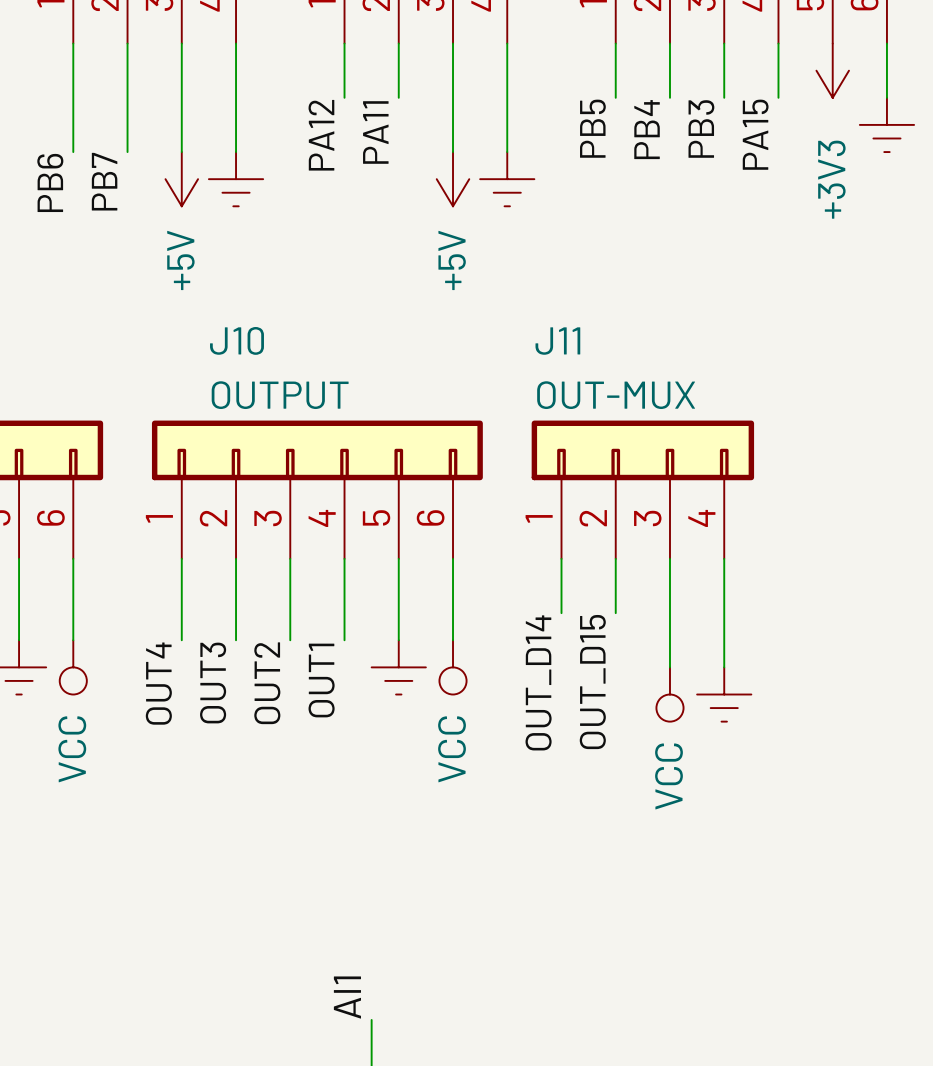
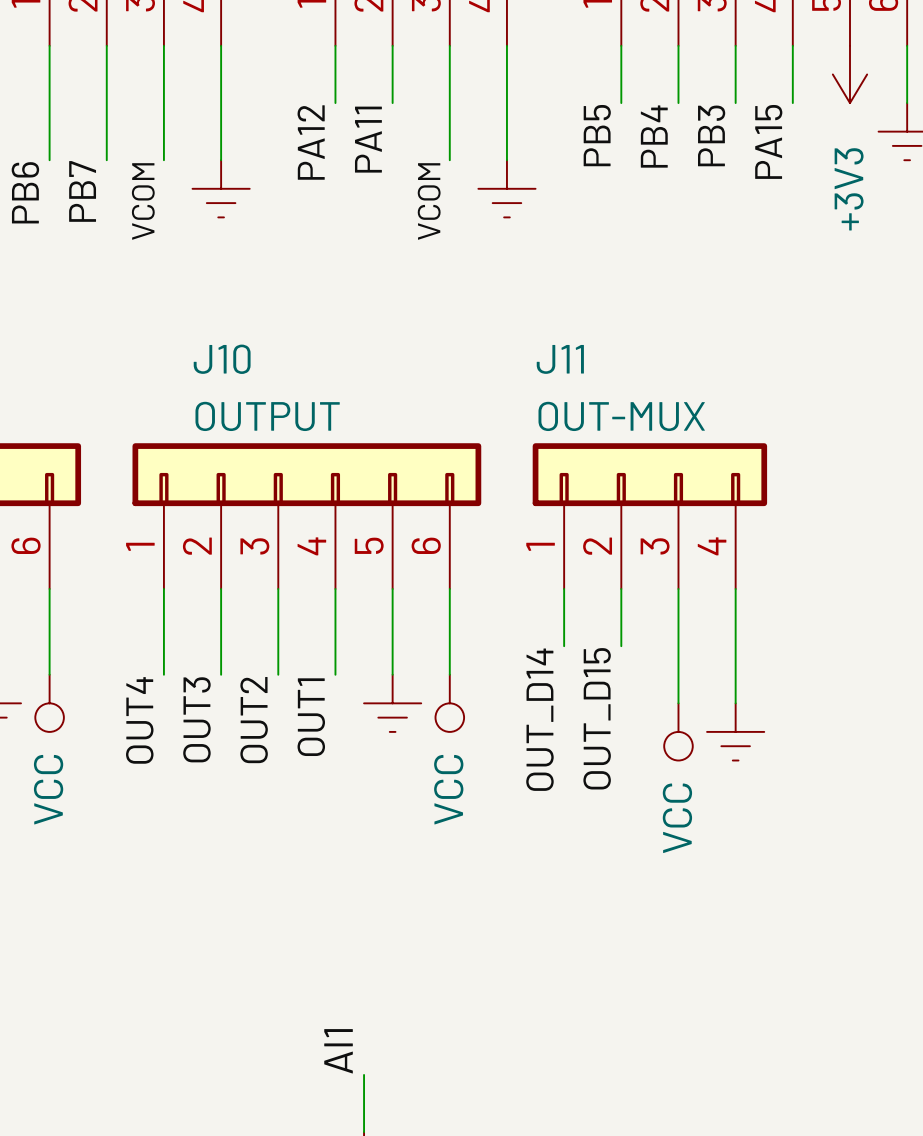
power symbol: +5V (181, 179) -> none
power symbol: +5V (453, 179) -> none
label: none -> VCOM (143, 201)
label: none -> VCOM (429, 201)

